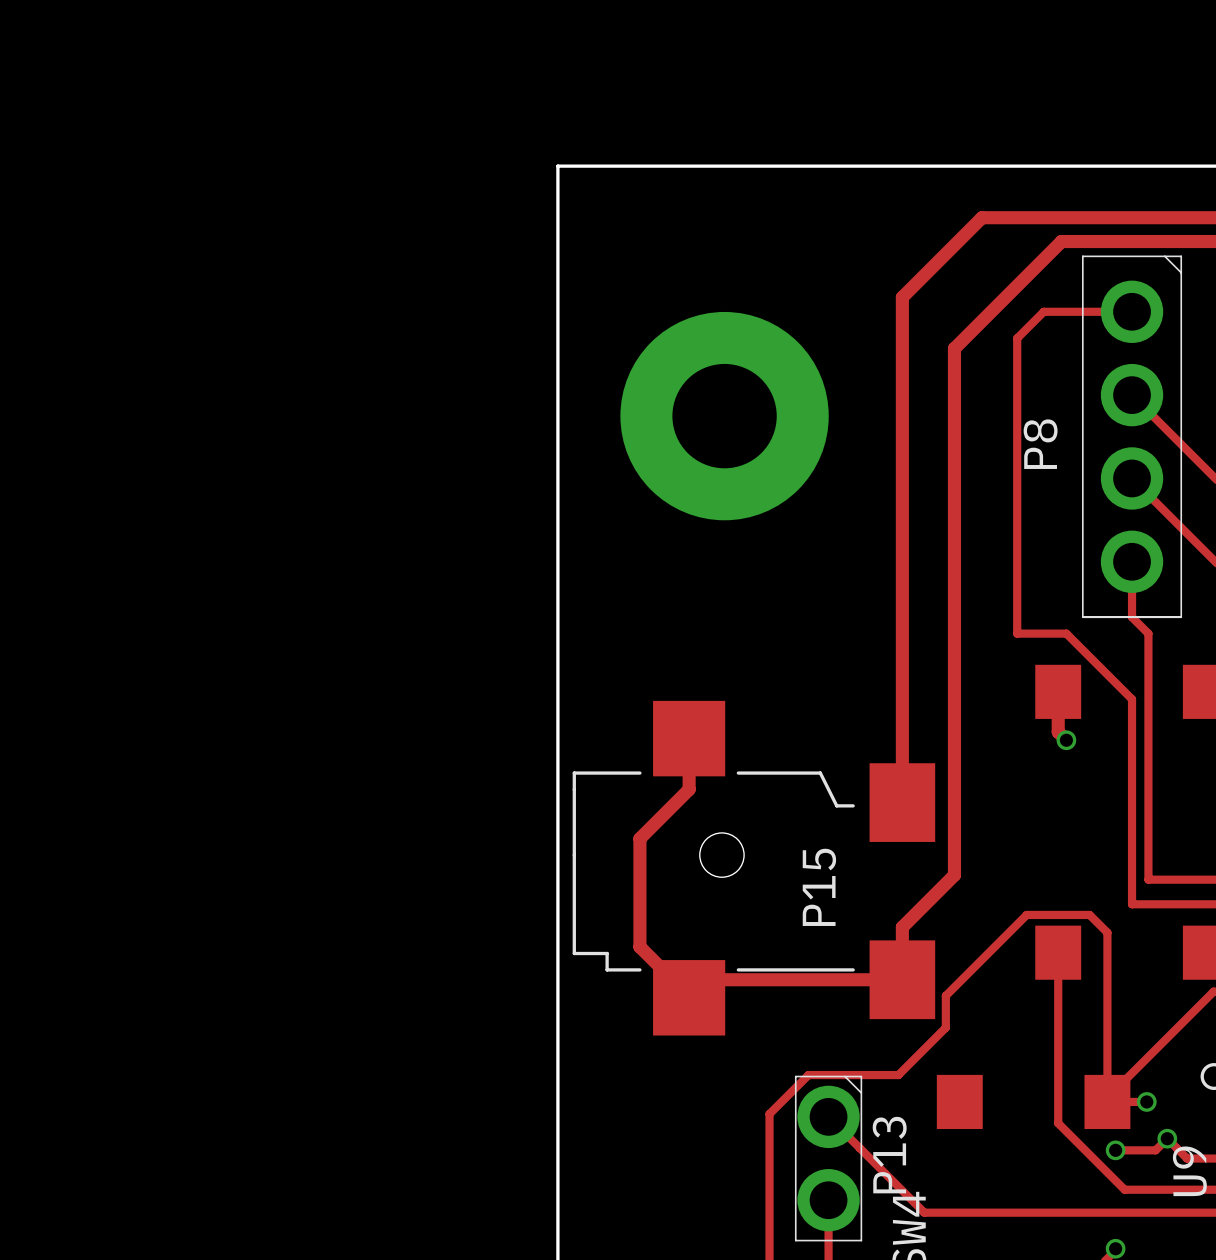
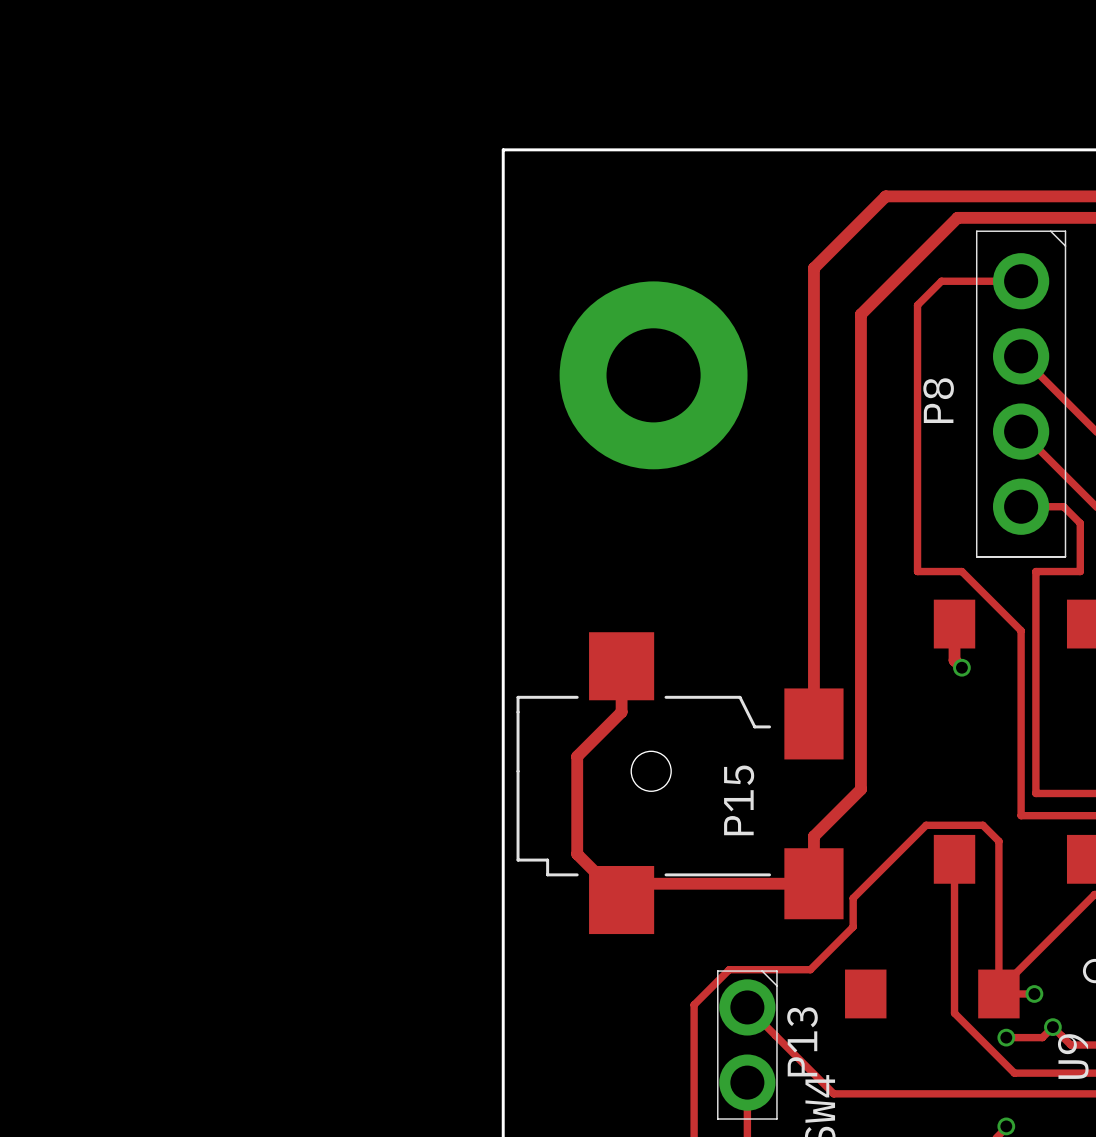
track: (1132, 561) (1132, 617) (1148, 633) -> (1021, 506) (1063, 506) (1080, 523) (1080, 571) (1035, 571)

